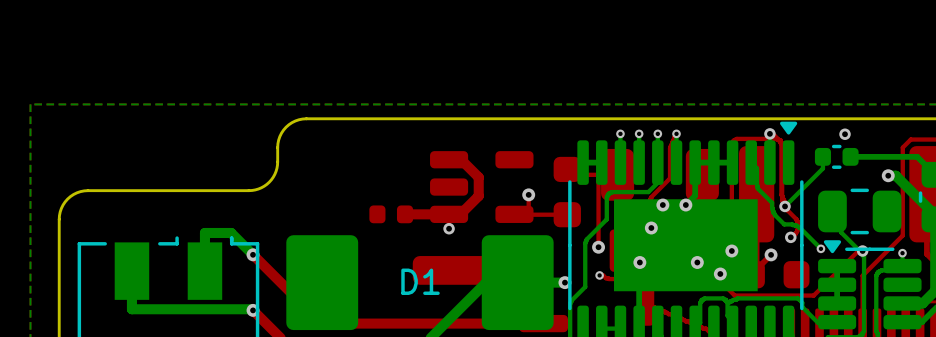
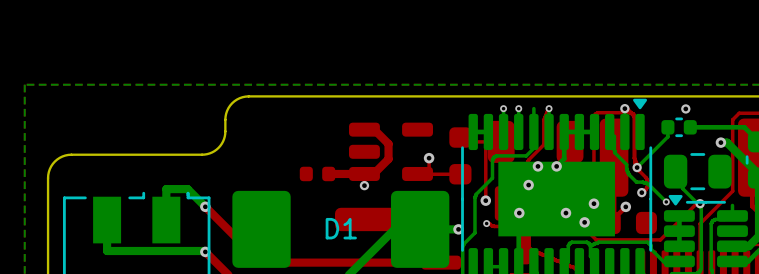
via: (657, 133) -> none
via: (902, 253) -> none

